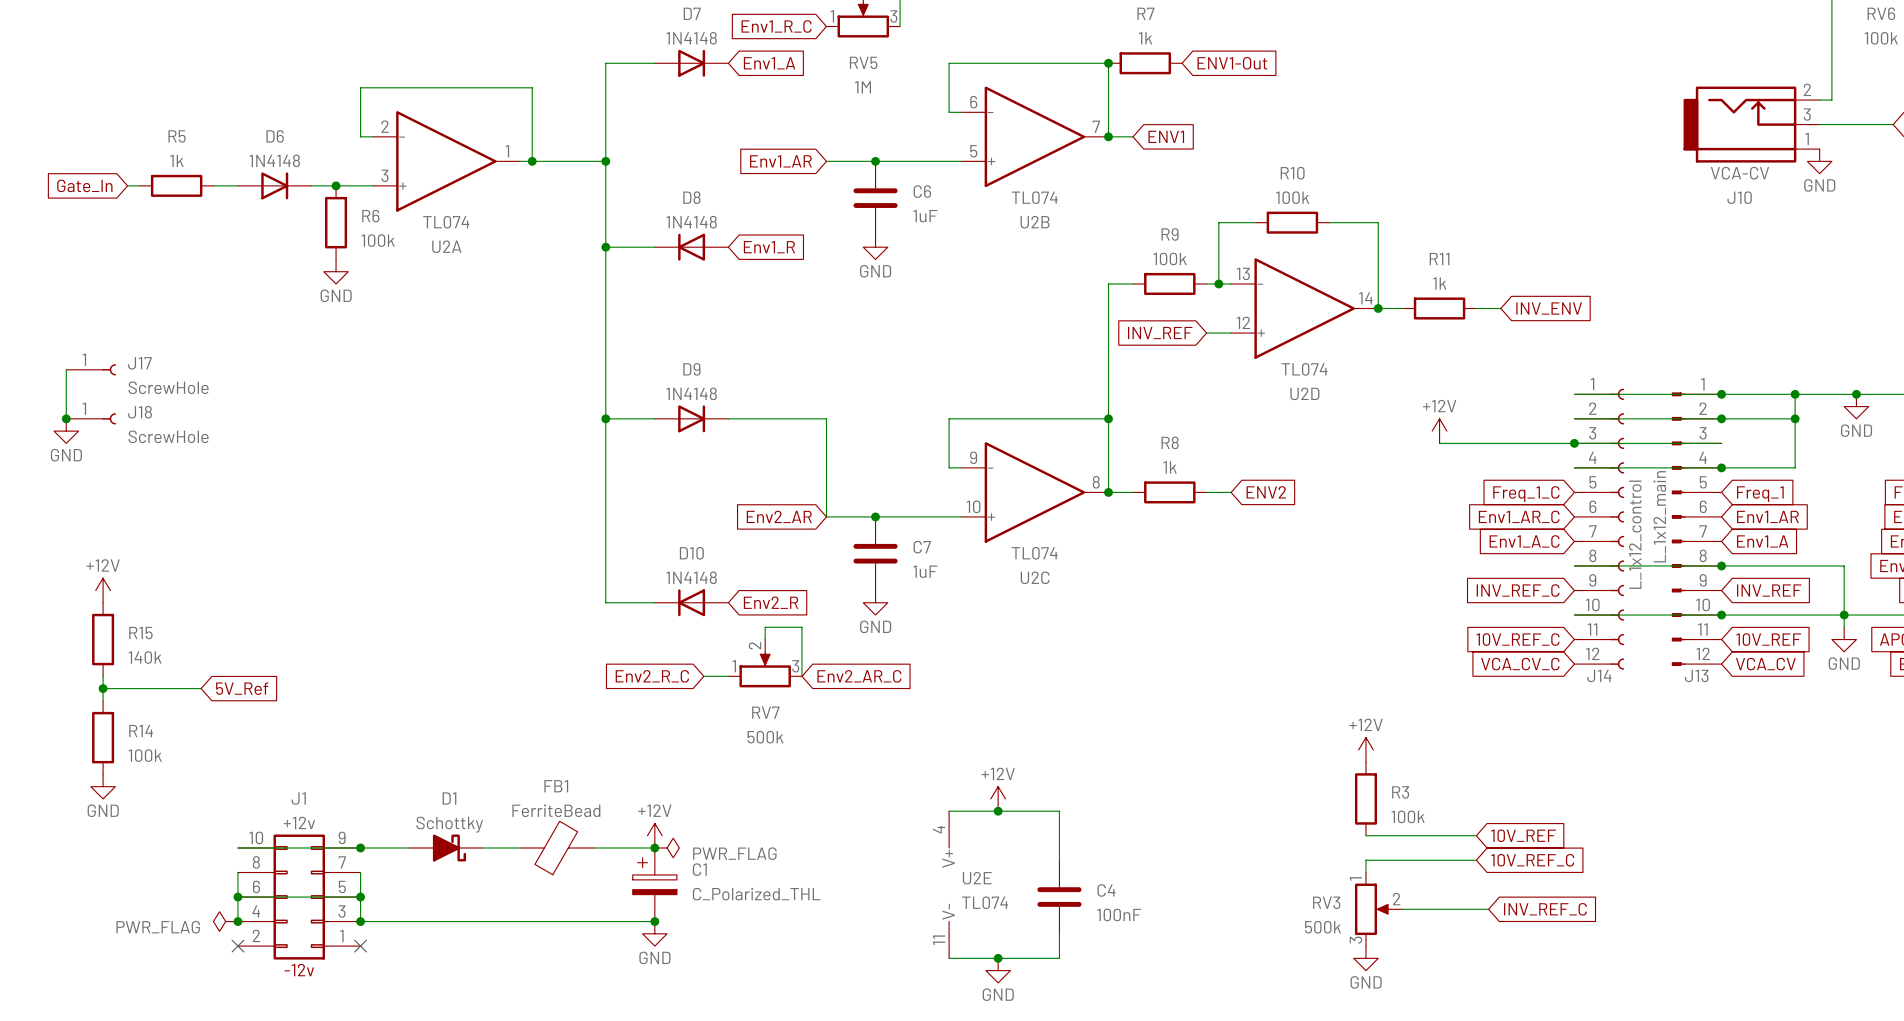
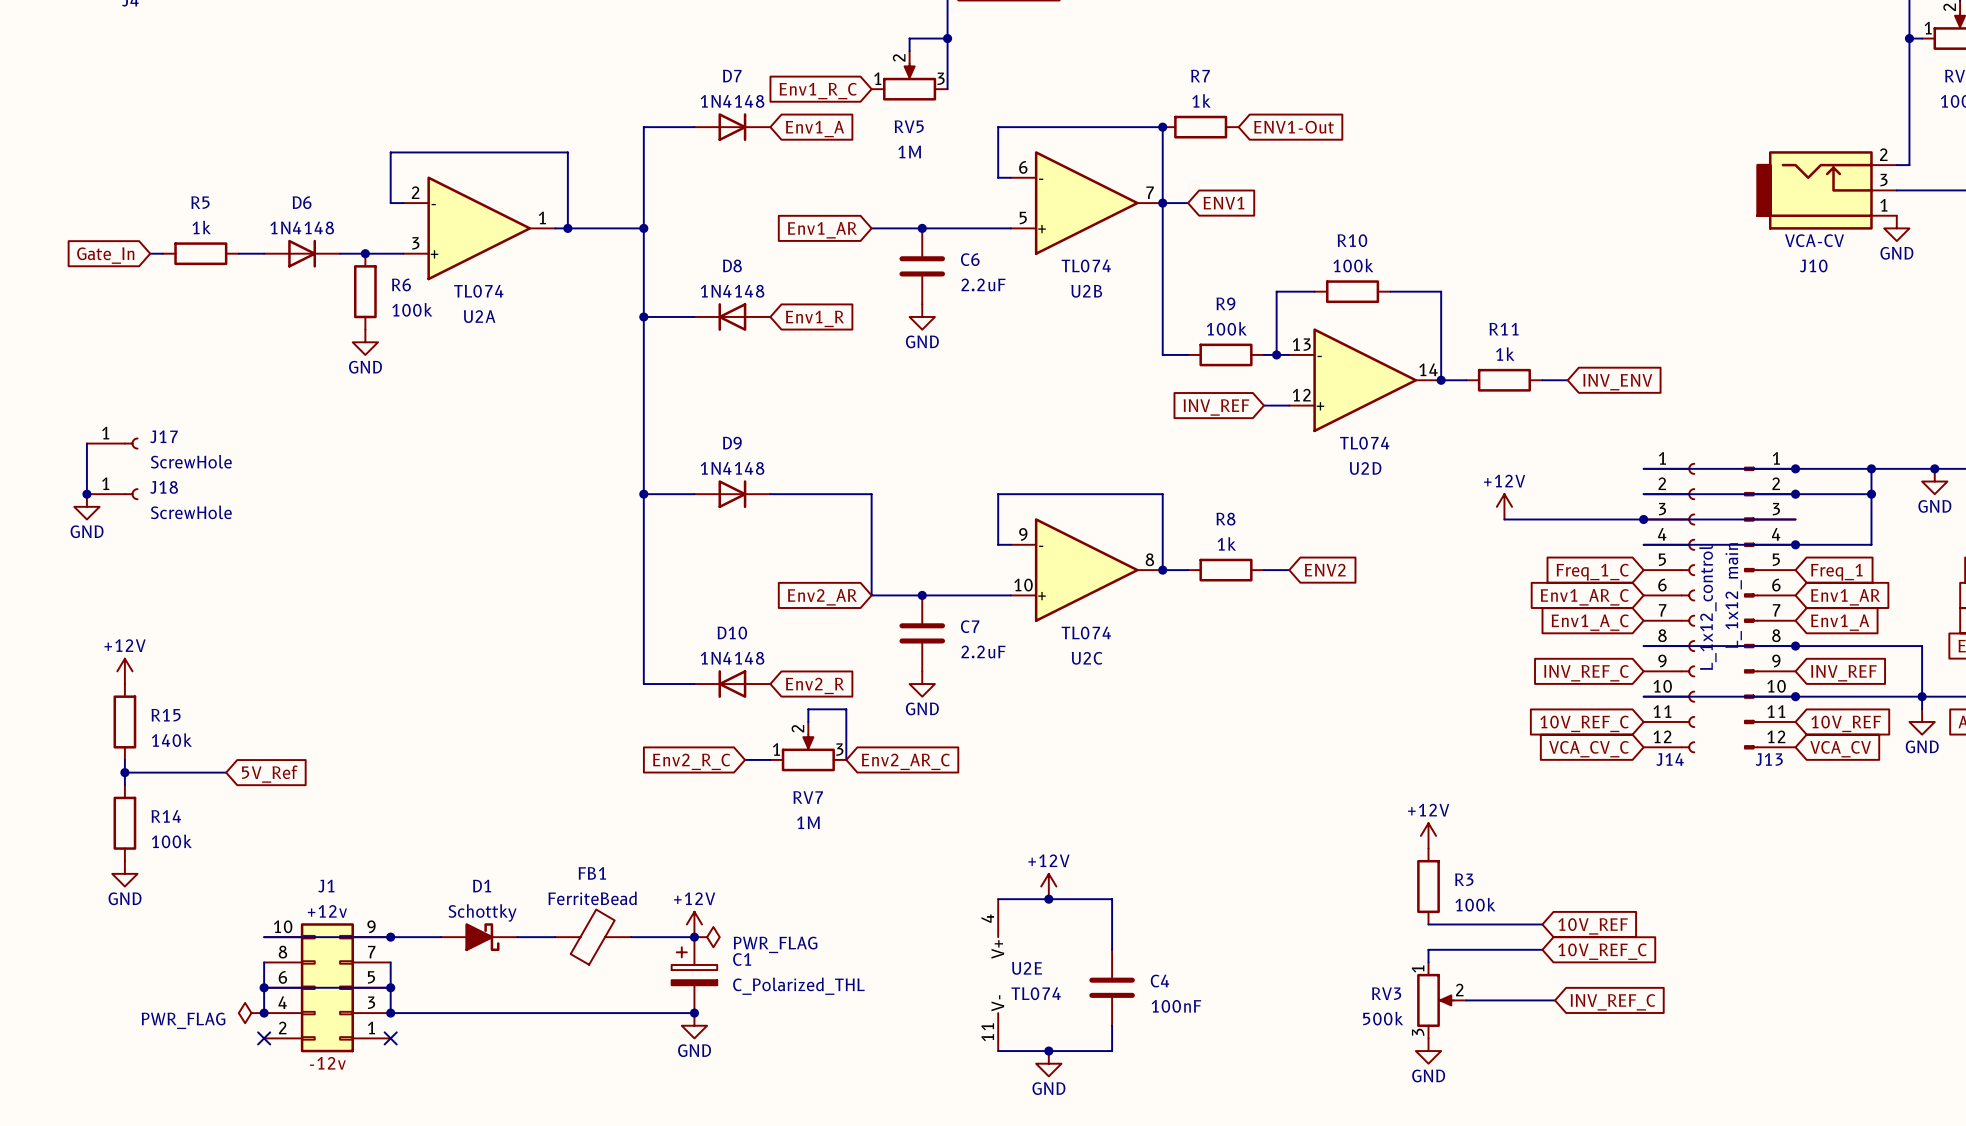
C6 value: 1uF (925, 216) -> 2.2uF (983, 284)
wire: (1108, 283) (1108, 418) -> (1162, 354) (1162, 203)
junction: (1108, 418) -> none
C7 value: 1uF (925, 571) -> 2.2uF (983, 651)
RV7 value: 500k (765, 737) -> 1M (808, 822)

